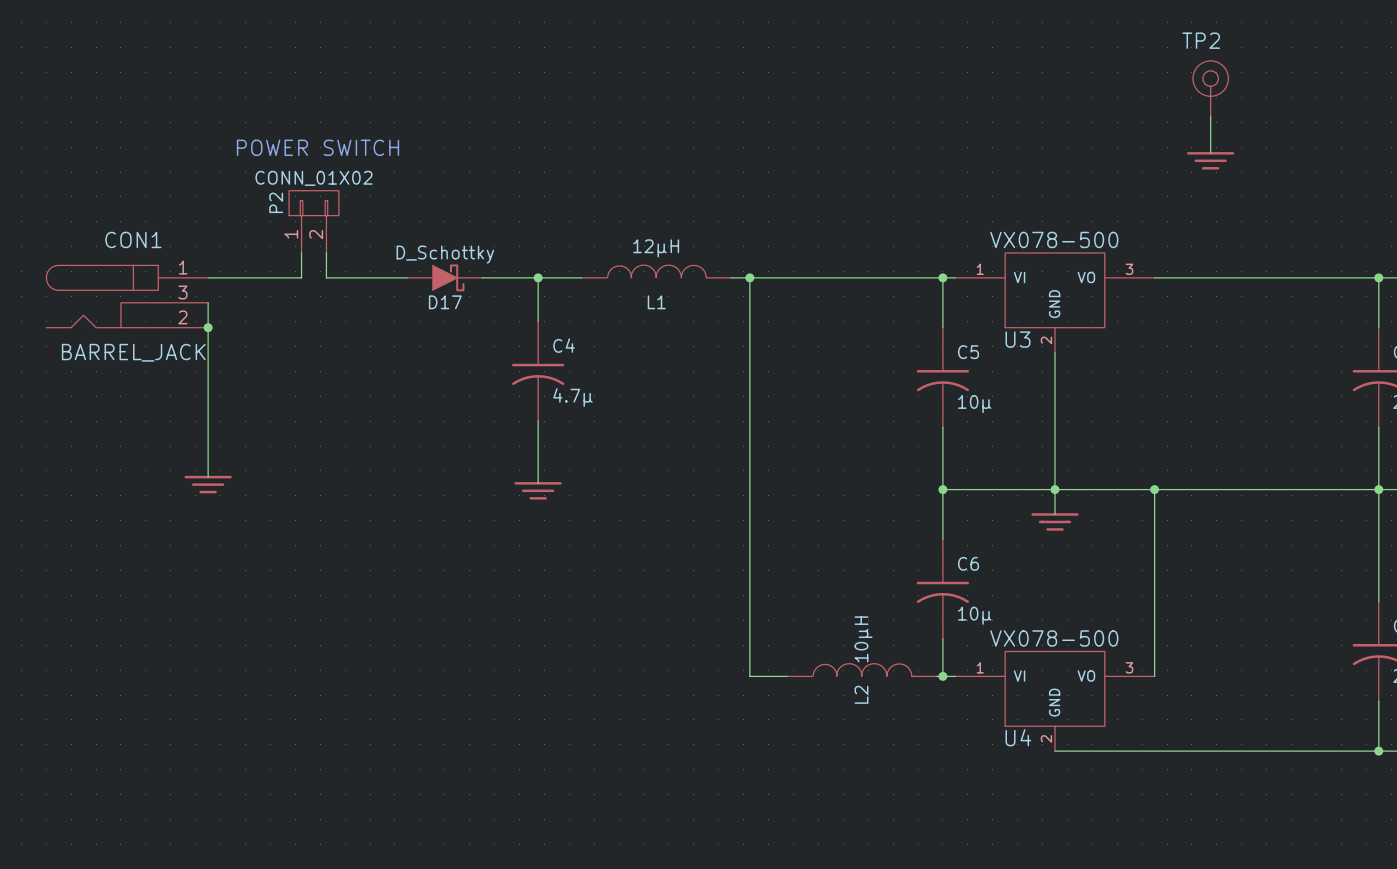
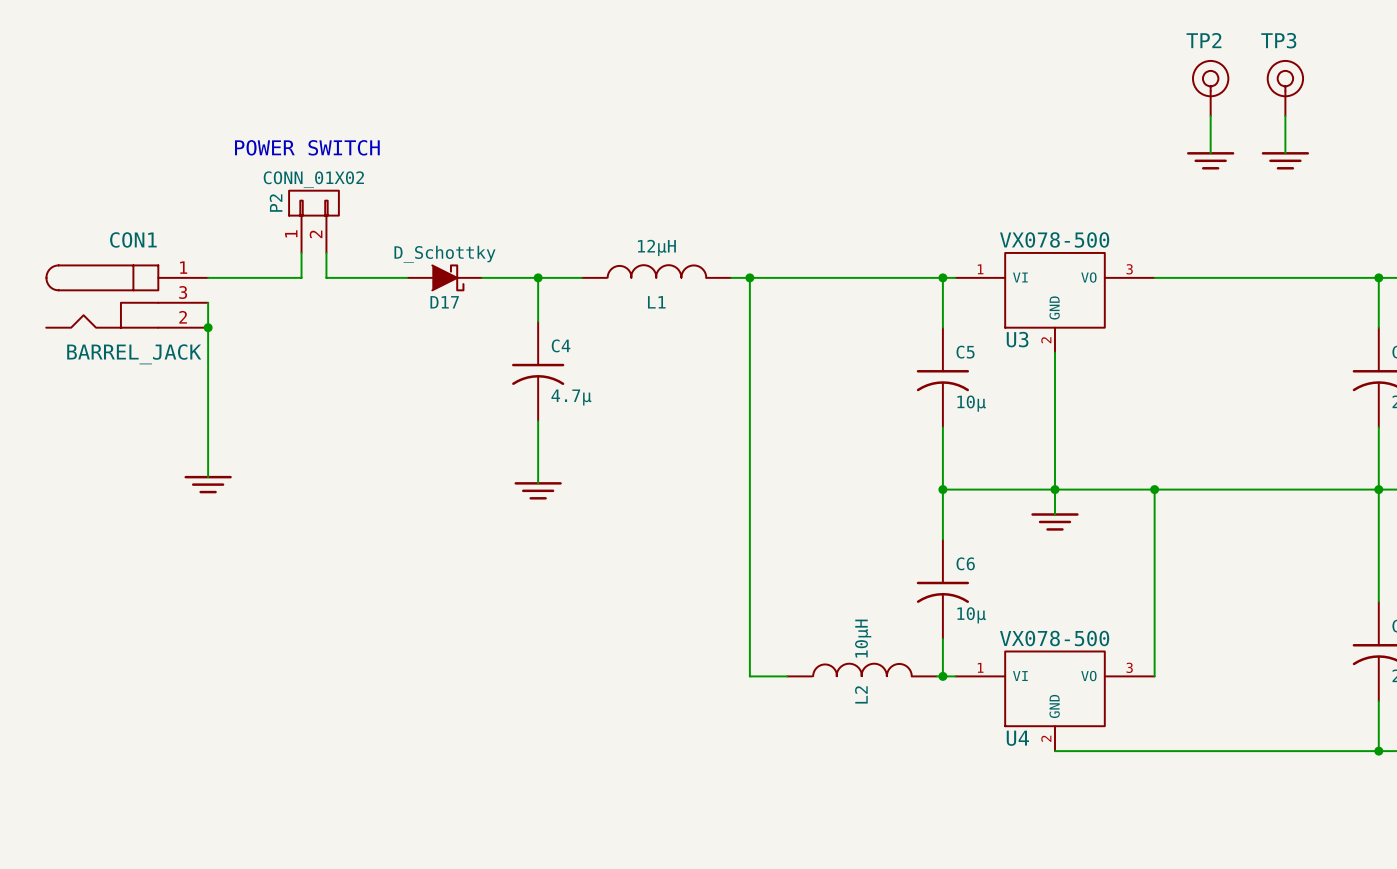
TP3: none -> (1285, 88)
wire: none -> (1285, 115) (1285, 153)
power symbol: none -> (1285, 160)

